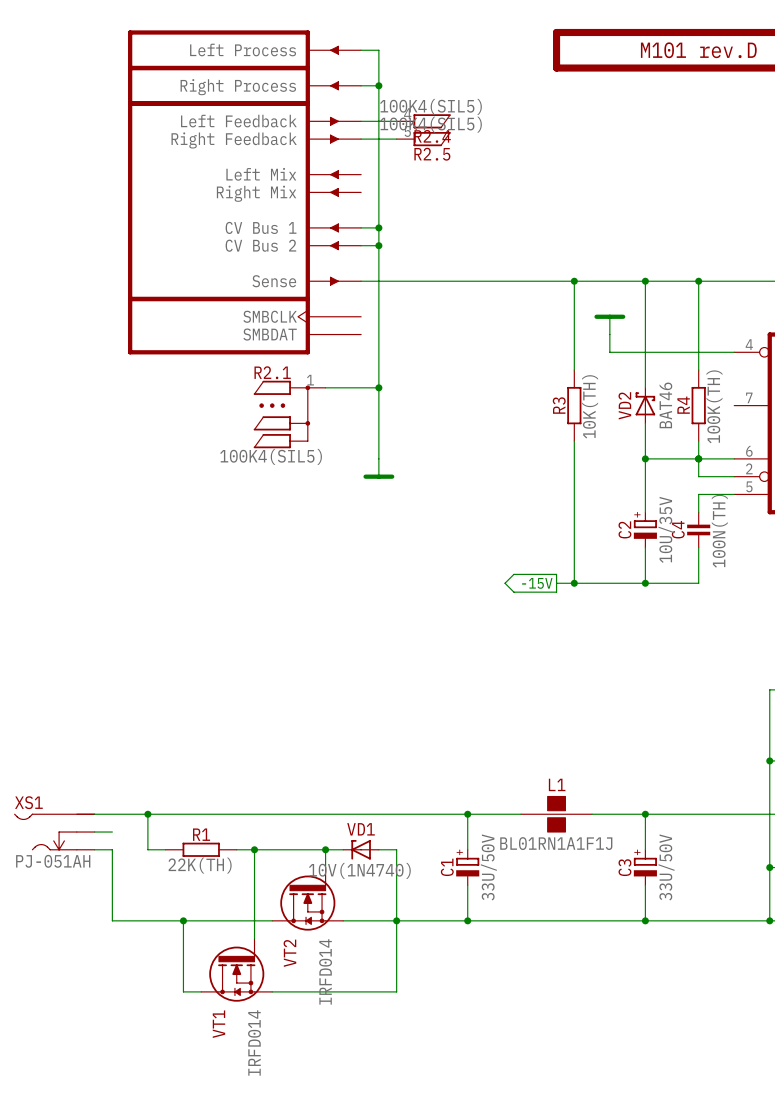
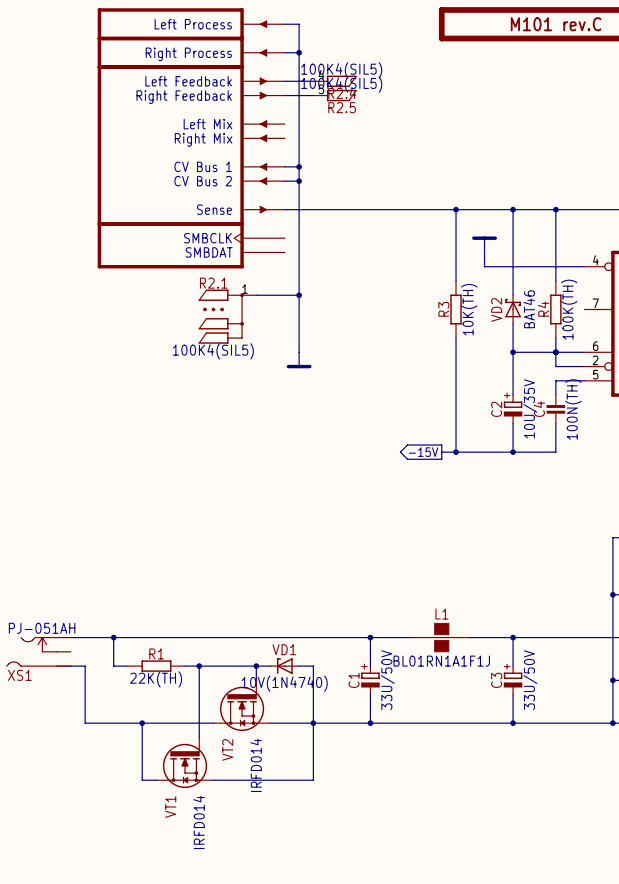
part value: M101 rev.D (698, 50) -> M101 rev.C (556, 24)
XS1 flip: as is (54, 832) -> up-down (38, 651)
wire: (94, 832) (112, 832) -> none

